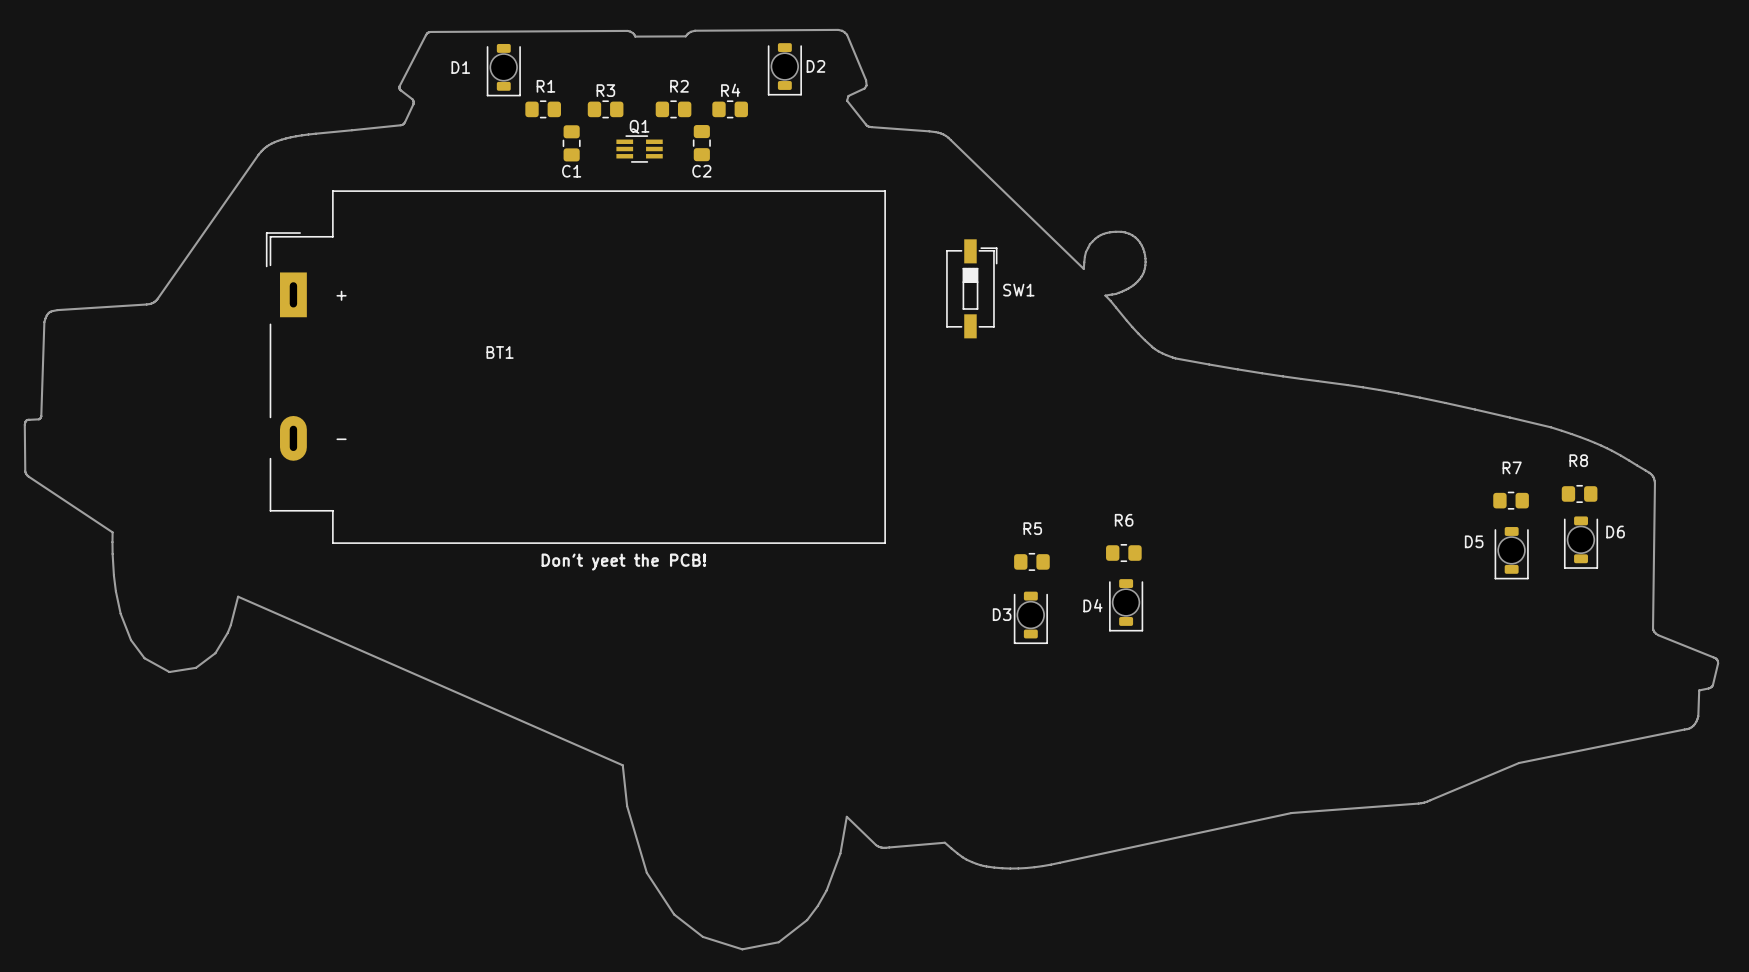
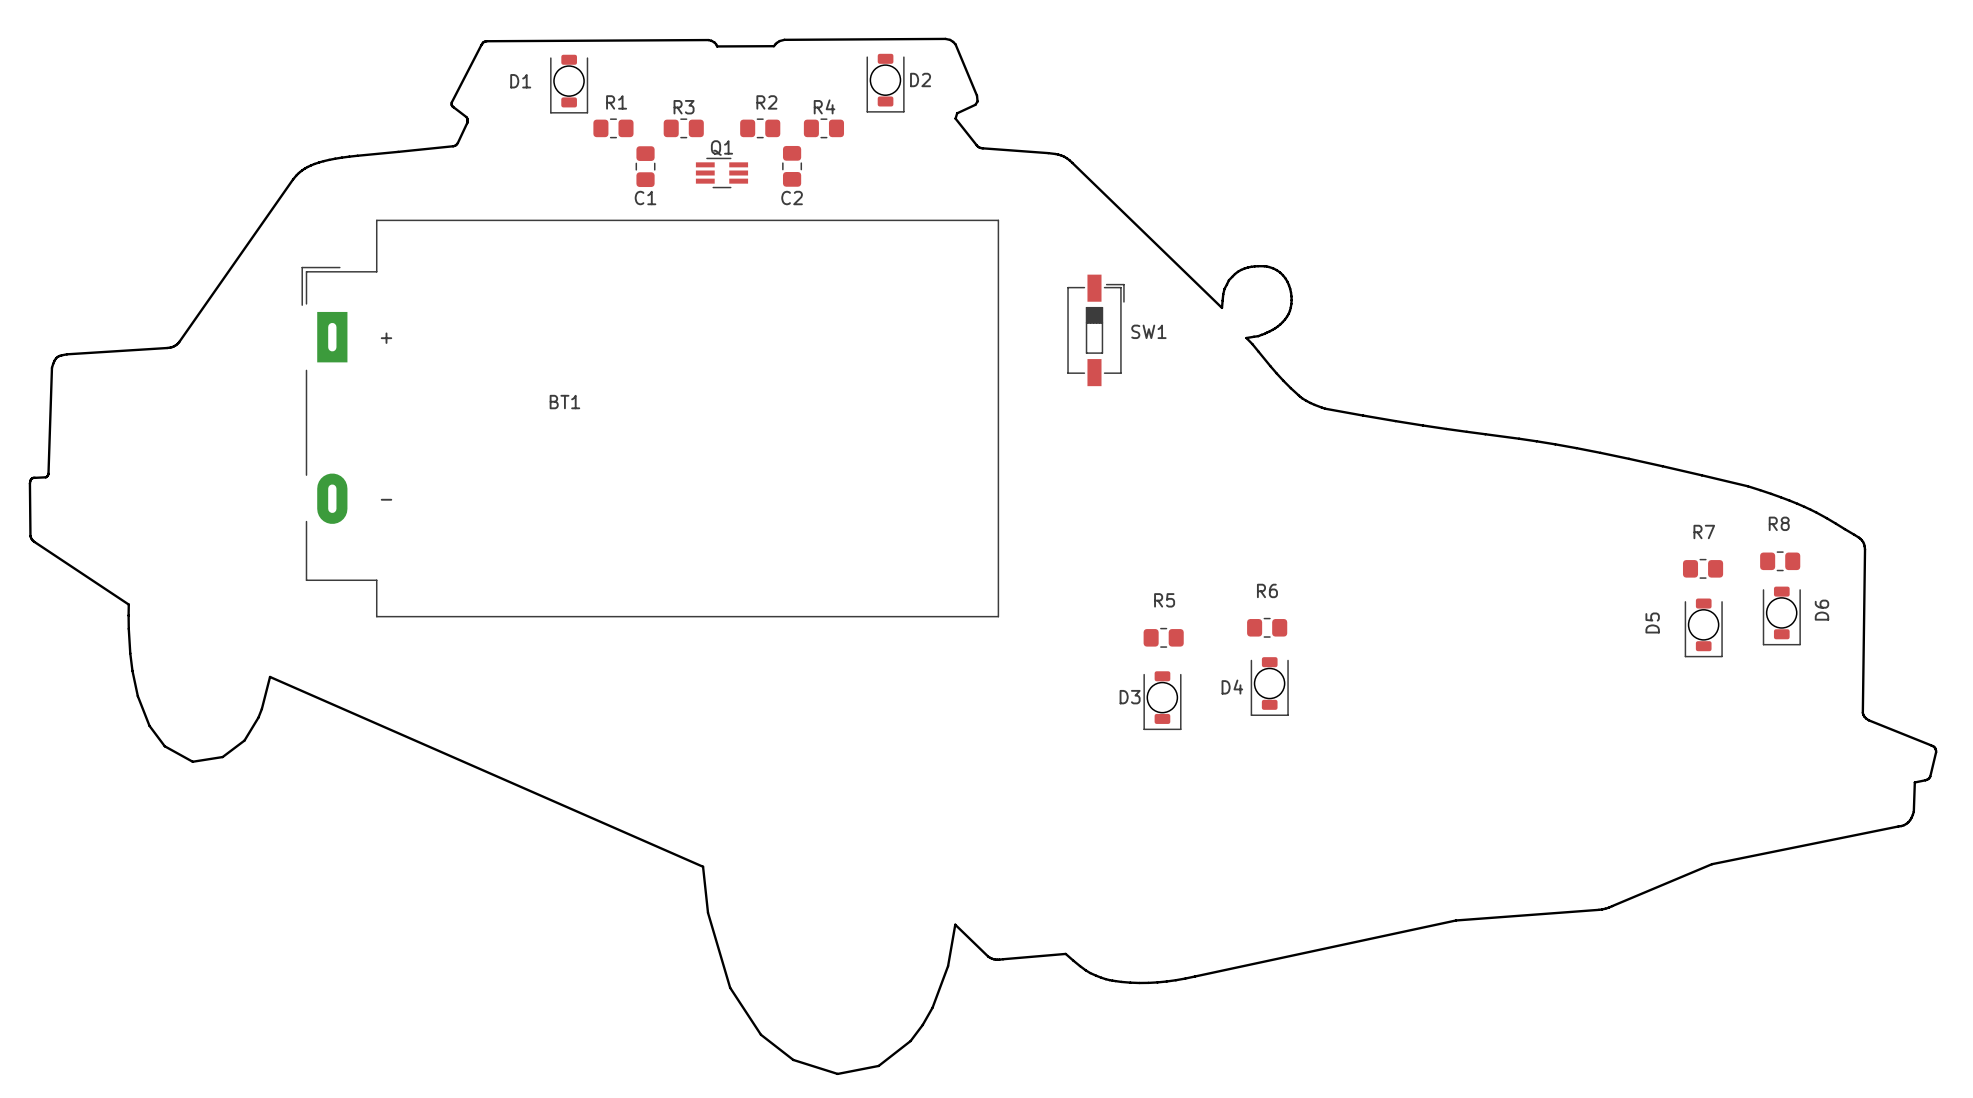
D6 name rotation: 0° (1615, 532) -> 90° counterclockwise (1821, 610)
D5 name rotation: 0° (1474, 541) -> 90° counterclockwise (1652, 622)
text: Don't yeet the PCB! (623, 562) -> none

